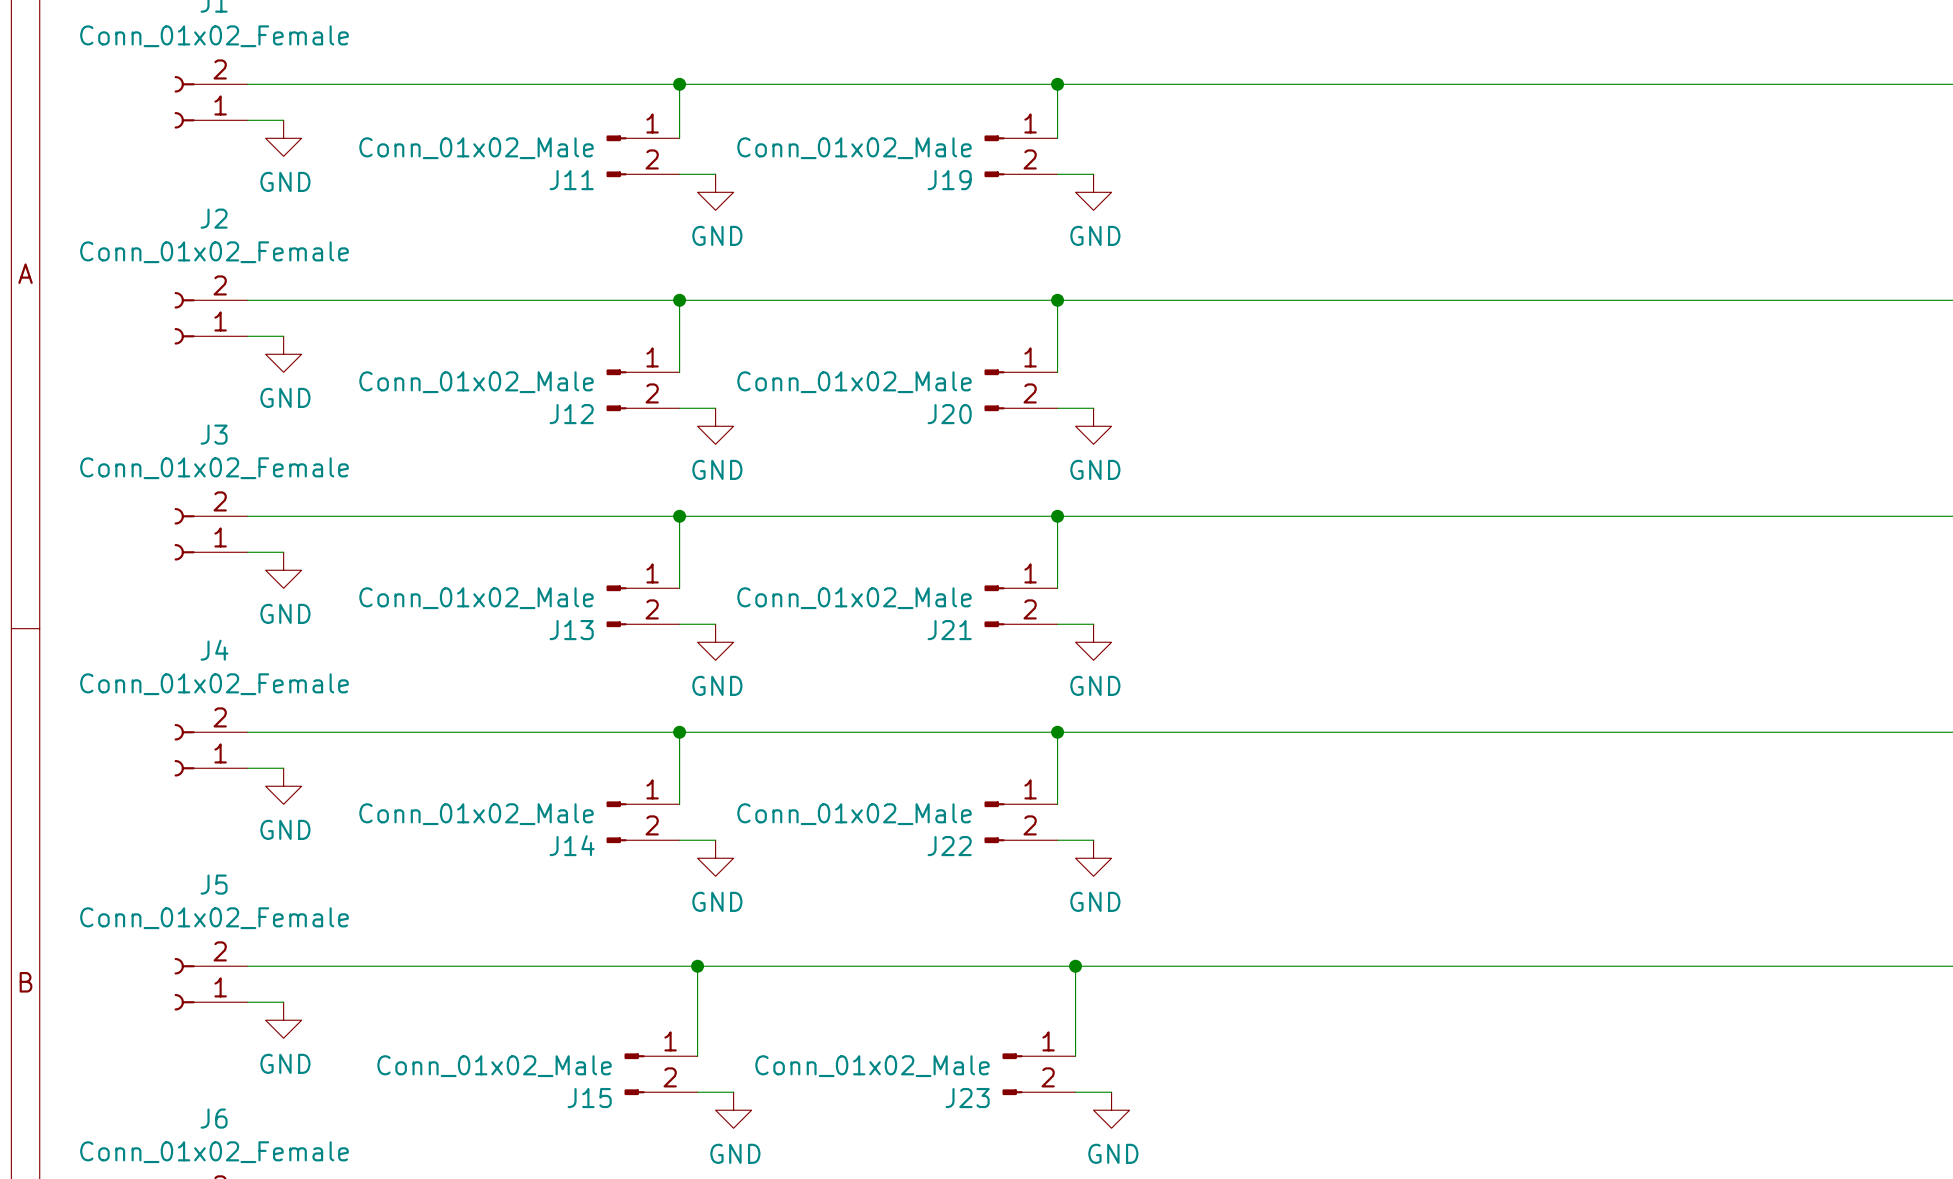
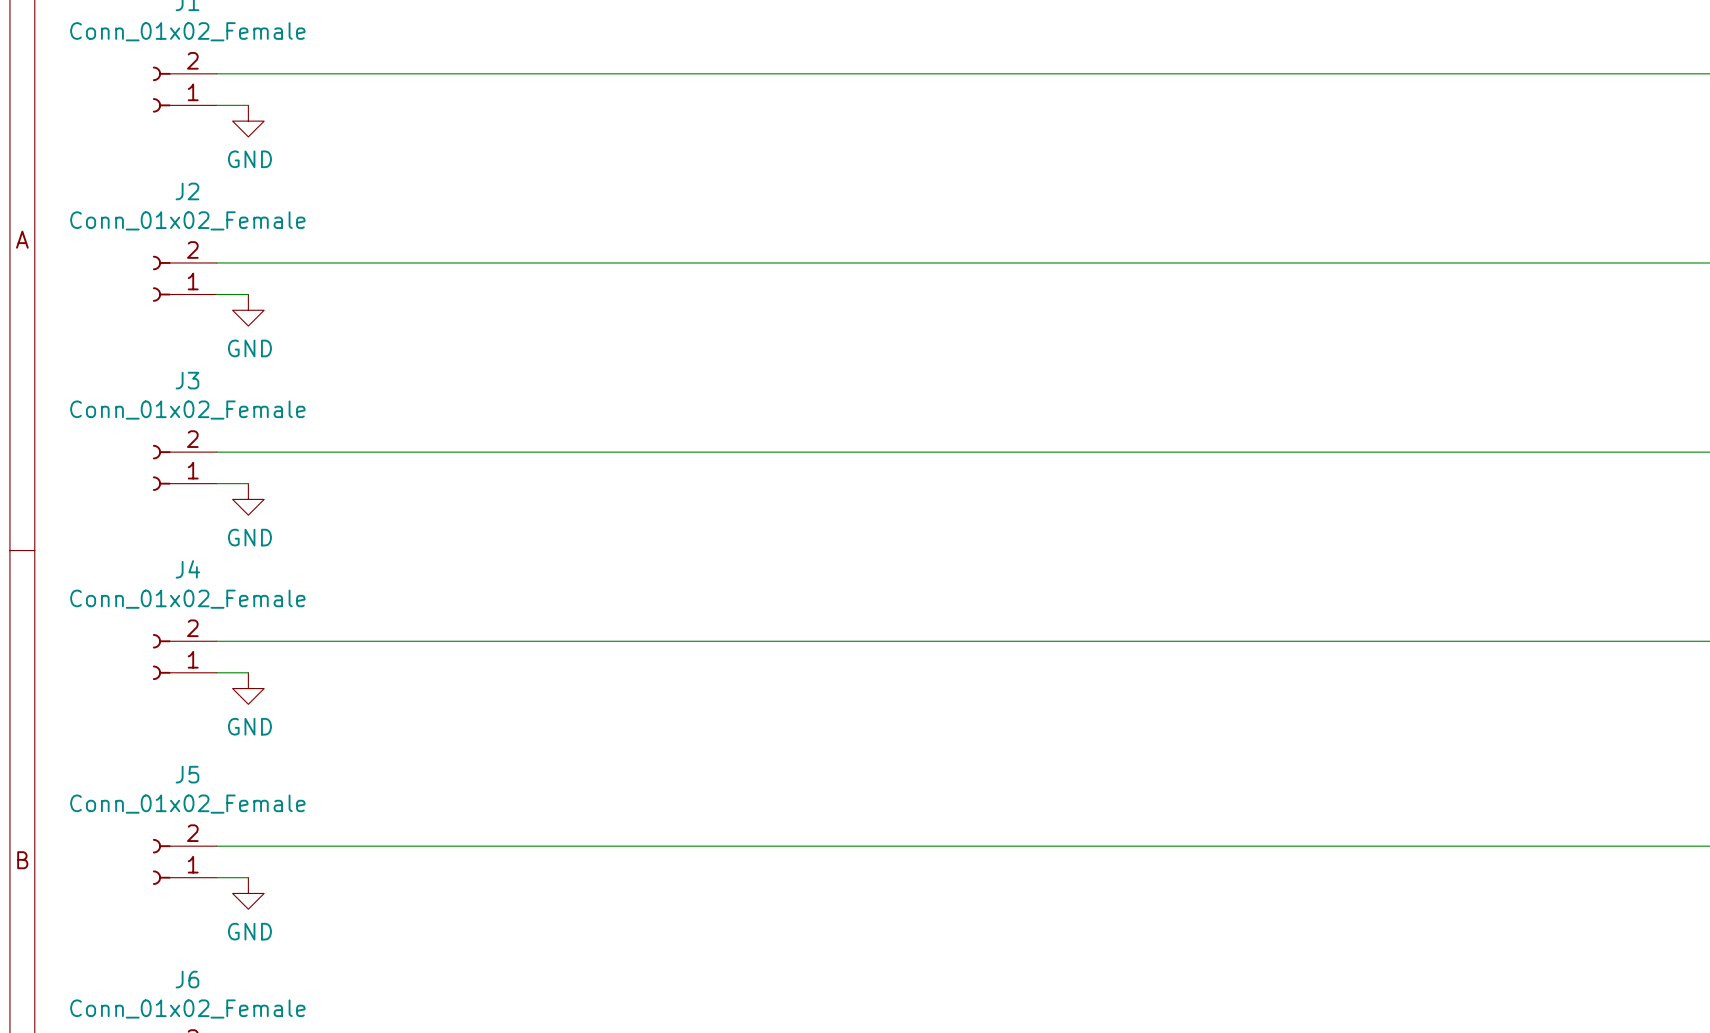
wire: (679, 84) (679, 138) -> none
junction: (679, 84) -> none
wire: (1057, 84) (1057, 138) -> none
junction: (1057, 84) -> none
J11: Conn_01x02_Male (643, 156) -> none
J19: Conn_01x02_Male (1021, 156) -> none
wire: (679, 174) (715, 174) -> none
wire: (1057, 174) (1093, 174) -> none
power symbol: GND (715, 192) -> none
power symbol: GND (1093, 192) -> none
wire: (679, 300) (679, 372) -> none
junction: (679, 300) -> none
wire: (1057, 300) (1057, 372) -> none
junction: (1057, 300) -> none
J12: Conn_01x02_Male (643, 390) -> none
J20: Conn_01x02_Male (1021, 390) -> none
wire: (679, 408) (715, 408) -> none
wire: (1057, 408) (1093, 408) -> none
power symbol: GND (715, 426) -> none
power symbol: GND (1093, 426) -> none
wire: (679, 516) (679, 588) -> none
junction: (679, 516) -> none
wire: (1057, 516) (1057, 588) -> none
junction: (1057, 516) -> none
J13: Conn_01x02_Male (643, 606) -> none
J21: Conn_01x02_Male (1021, 606) -> none
wire: (679, 624) (715, 624) -> none
wire: (1057, 624) (1093, 624) -> none
power symbol: GND (715, 642) -> none
power symbol: GND (1093, 642) -> none
wire: (679, 732) (679, 804) -> none
junction: (679, 732) -> none
wire: (1057, 732) (1057, 804) -> none
junction: (1057, 732) -> none
J14: Conn_01x02_Male (643, 822) -> none
J22: Conn_01x02_Male (1021, 822) -> none
wire: (679, 840) (715, 840) -> none
wire: (1057, 840) (1093, 840) -> none
power symbol: GND (715, 858) -> none
power symbol: GND (1093, 858) -> none
wire: (697, 966) (697, 1056) -> none
junction: (697, 966) -> none
wire: (1075, 966) (1075, 1056) -> none
junction: (1075, 966) -> none
J15: Conn_01x02_Male (661, 1074) -> none
J23: Conn_01x02_Male (1039, 1074) -> none
wire: (697, 1092) (733, 1092) -> none
wire: (1075, 1092) (1111, 1092) -> none
power symbol: GND (733, 1110) -> none
power symbol: GND (1111, 1110) -> none

